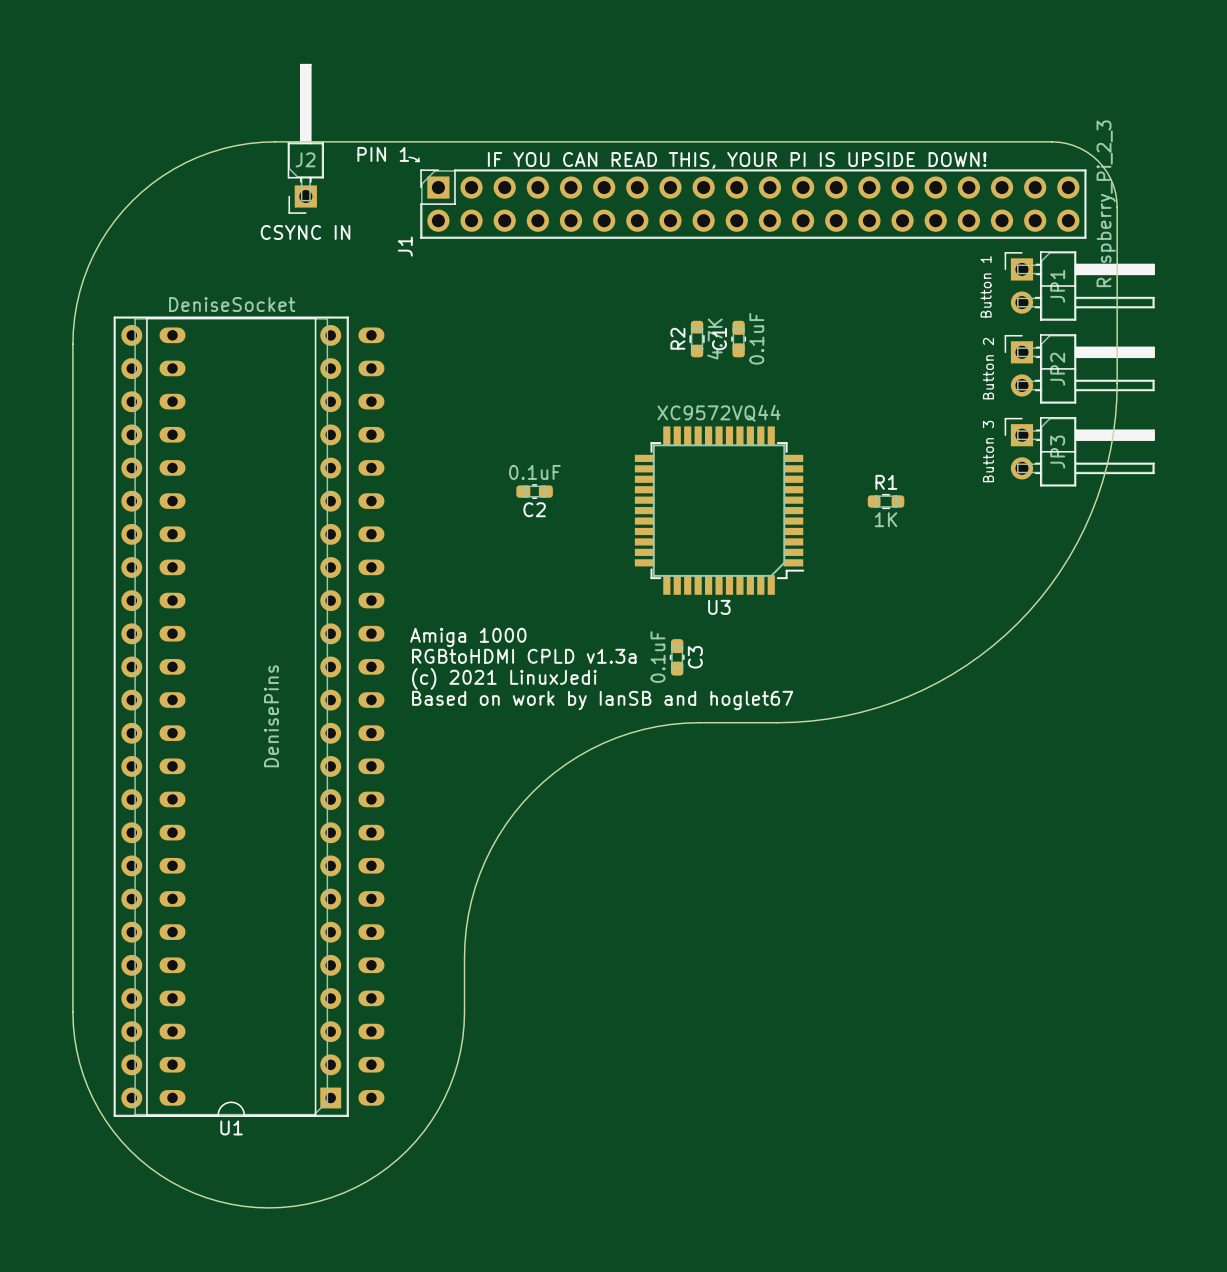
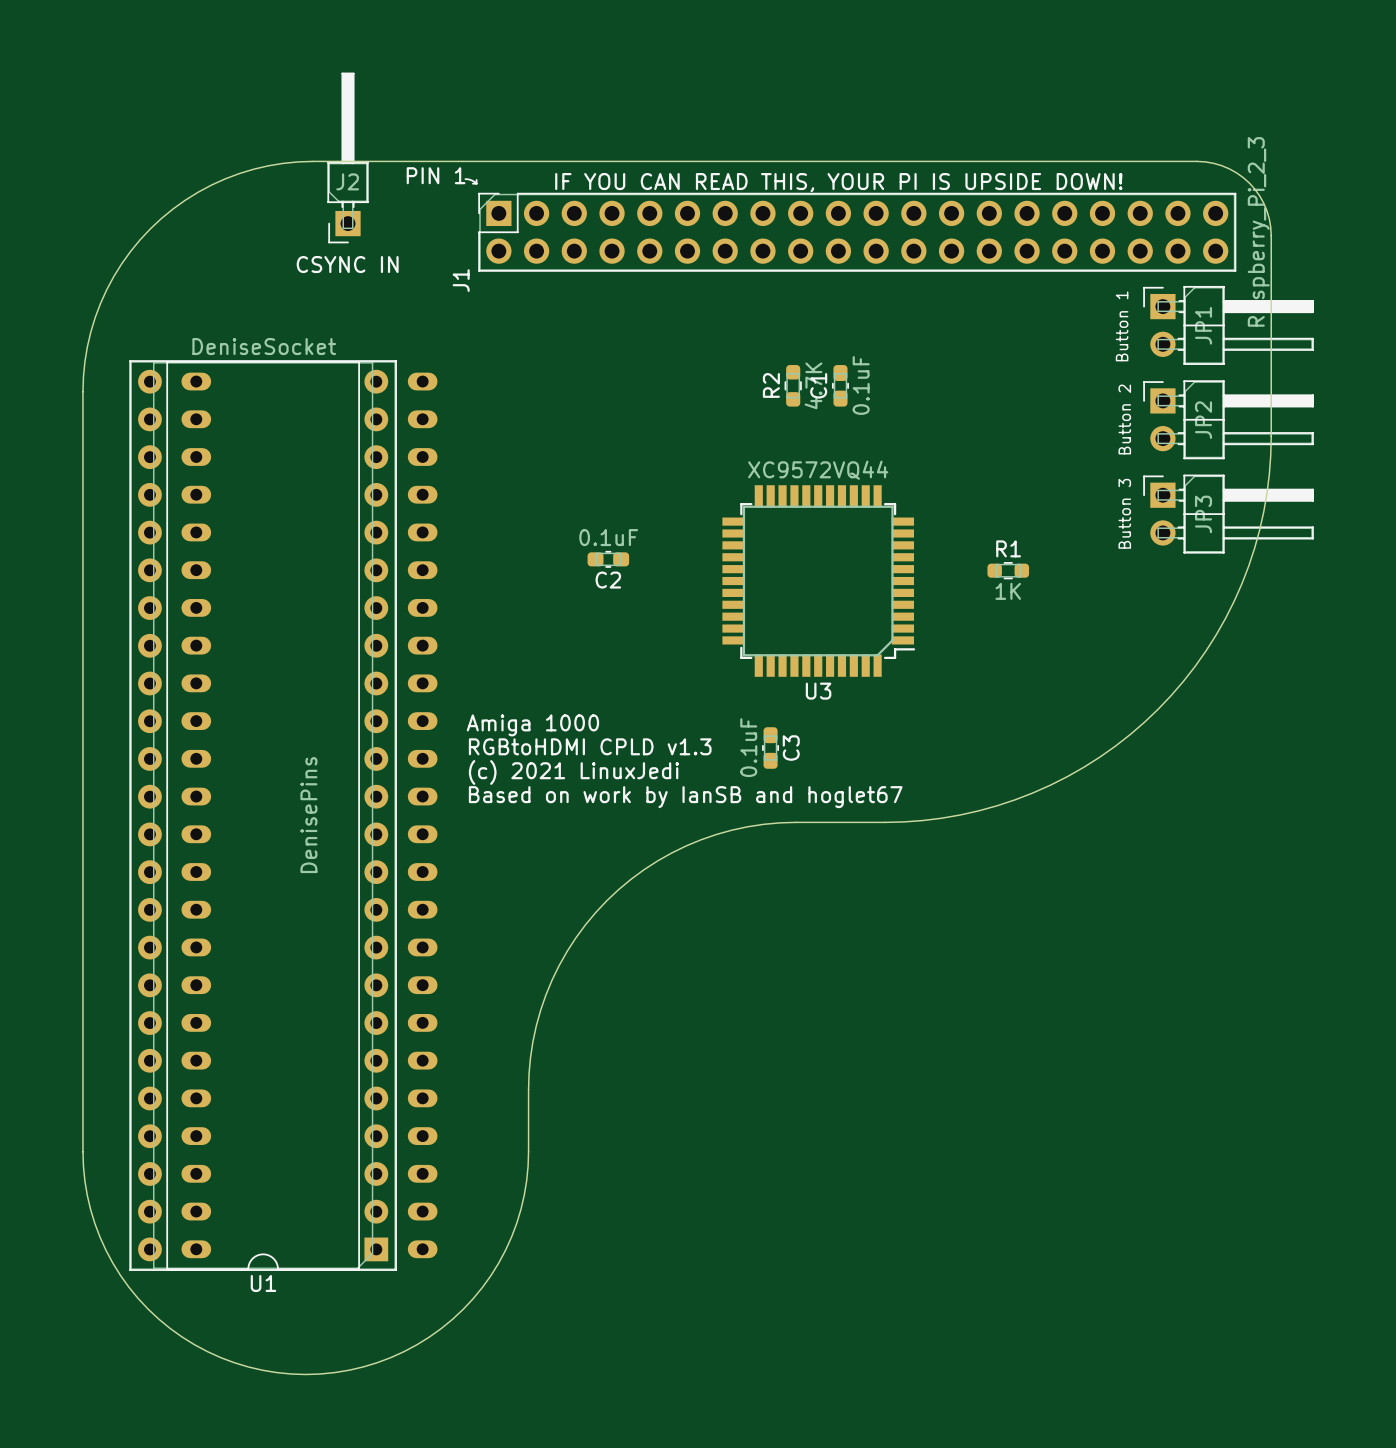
text: RGBtoHDMI CPLD v1.3a (524, 656) -> RGBtoHDMI CPLD v1.3 (590, 746)

